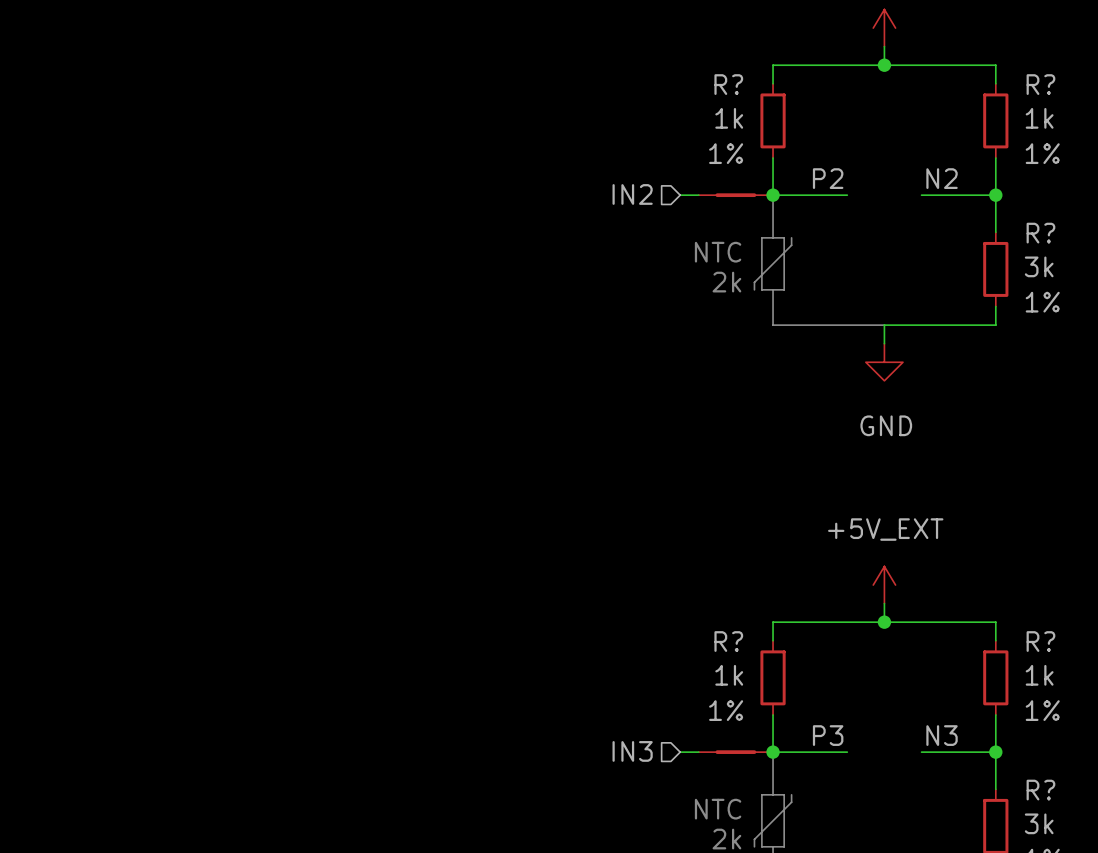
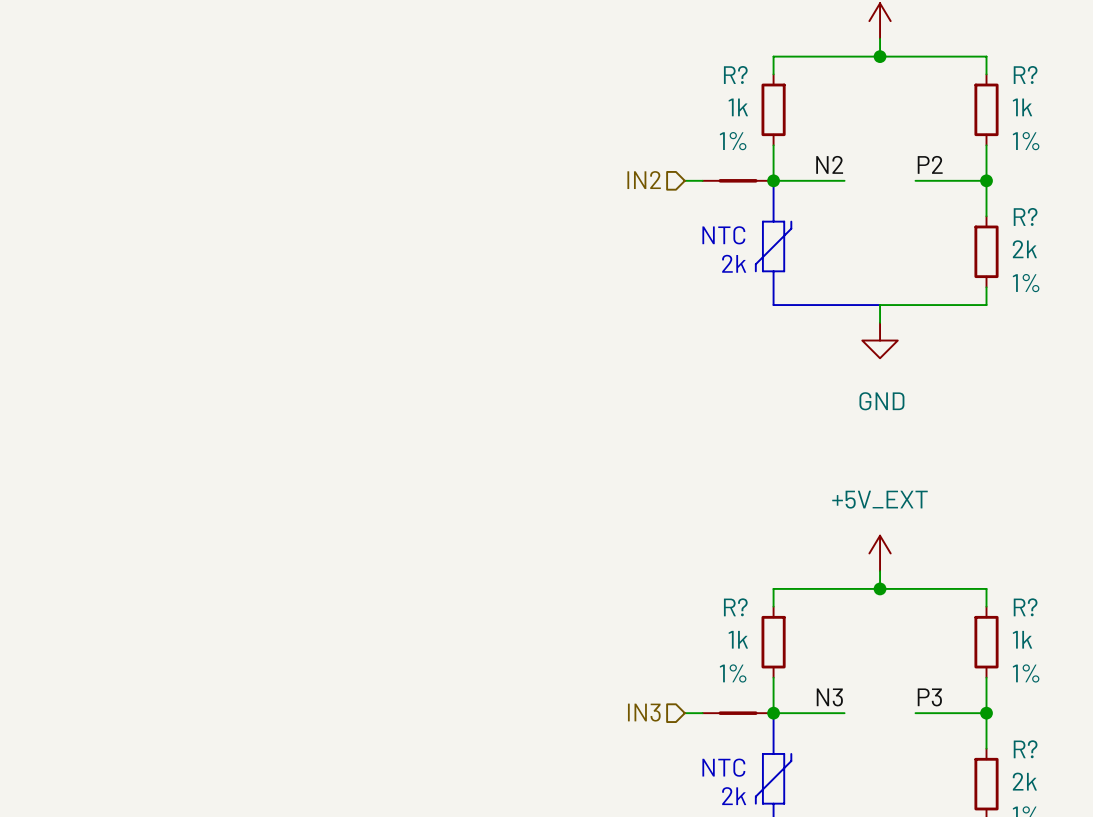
label: P2 (828, 178) -> N2 (829, 164)
label: N2 (942, 178) -> P2 (930, 164)
R? value: 3k (1039, 266) -> 2k (1024, 249)
label: P3 (828, 735) -> N3 (829, 697)
label: N3 (942, 735) -> P3 (929, 697)
R? value: 3k (1039, 823) -> 2k (1024, 781)

